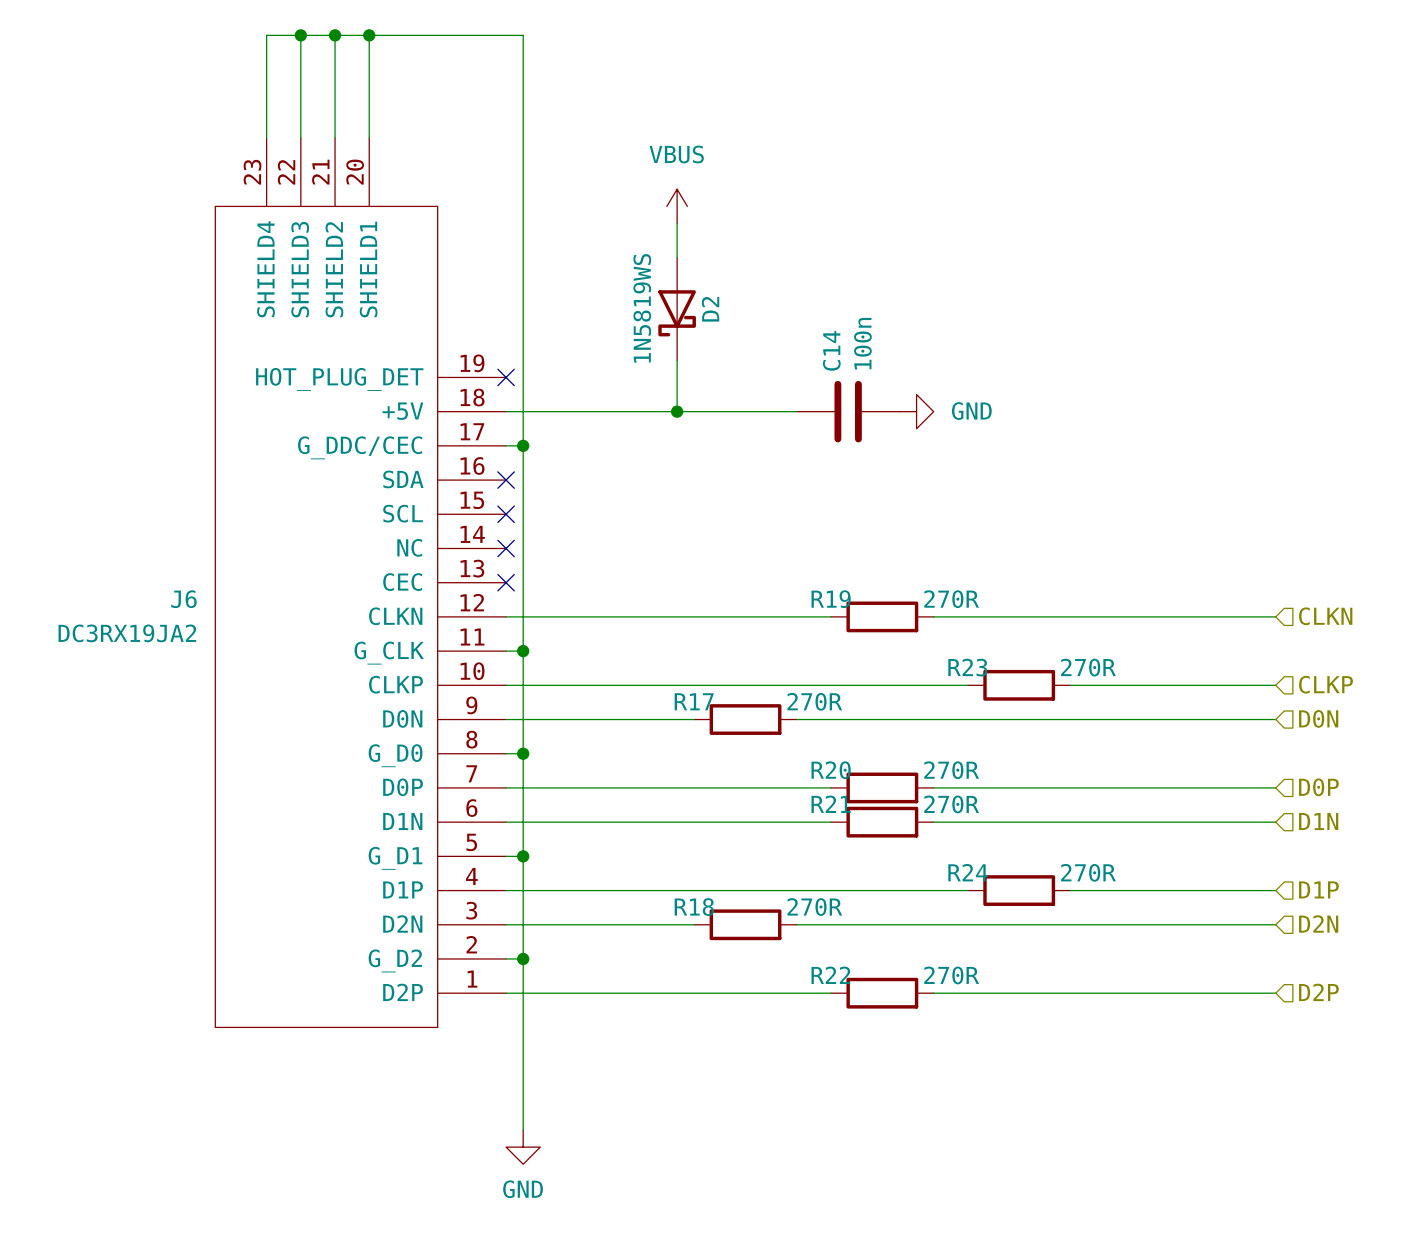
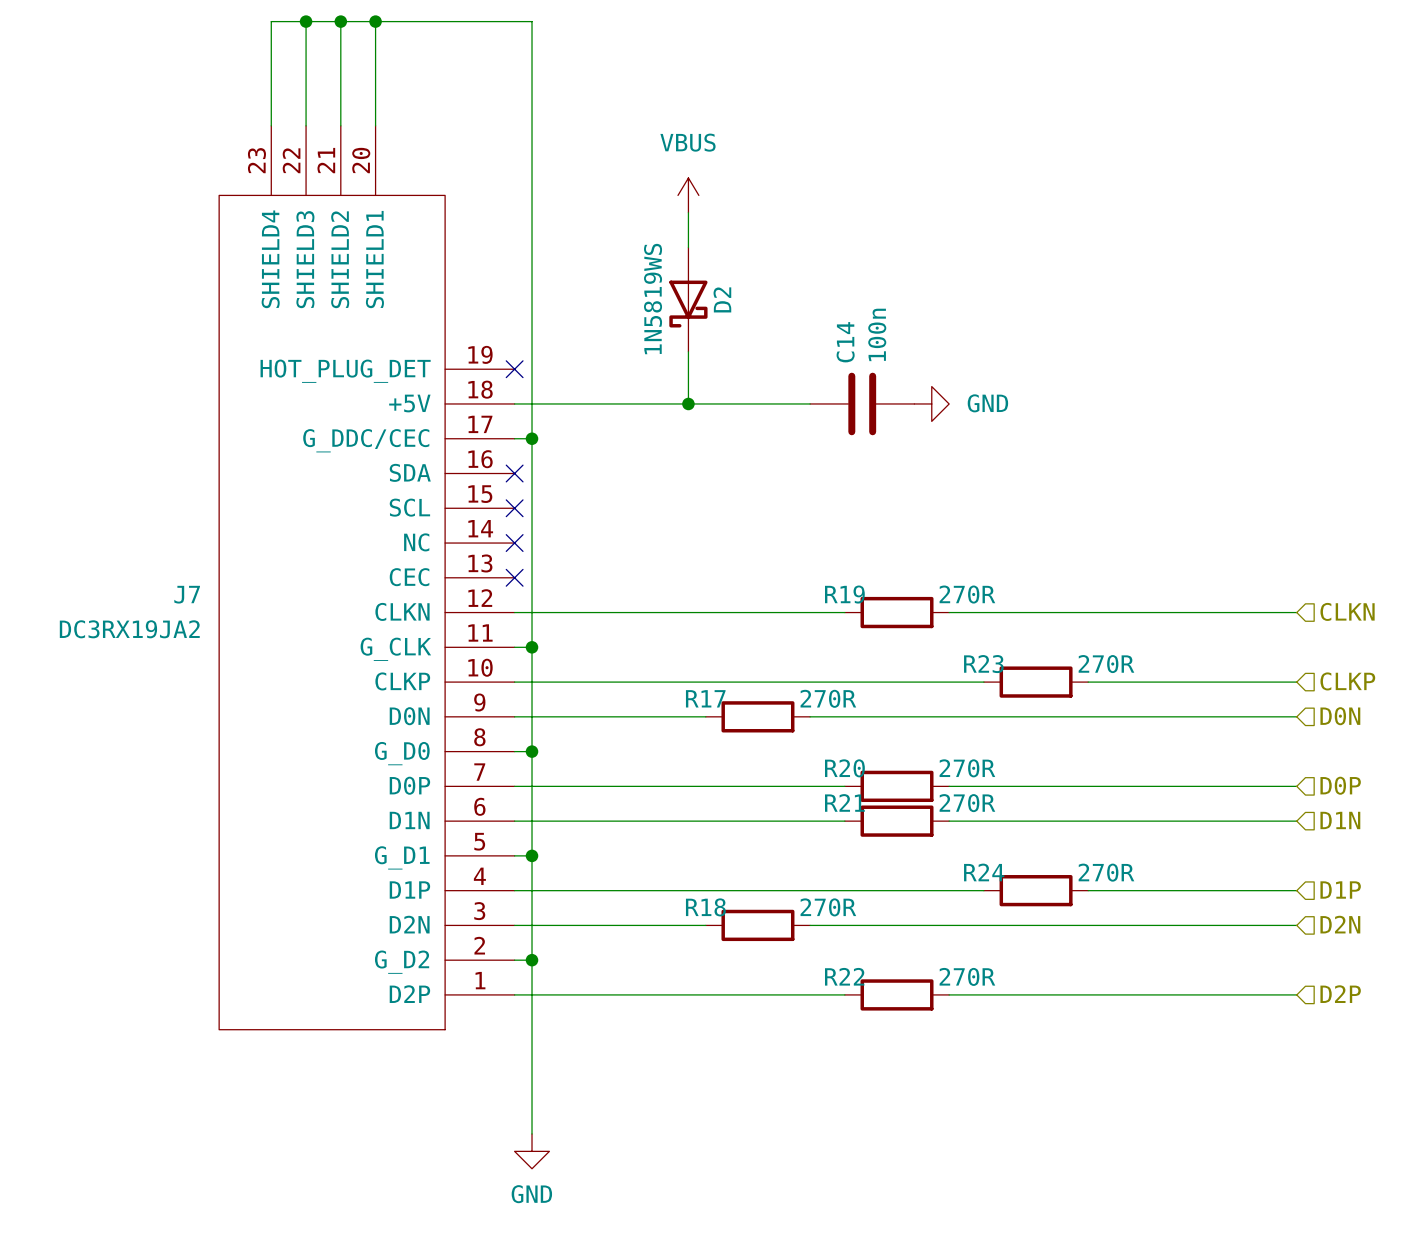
J6 name: J6 (183, 599) -> J7 (187, 594)

